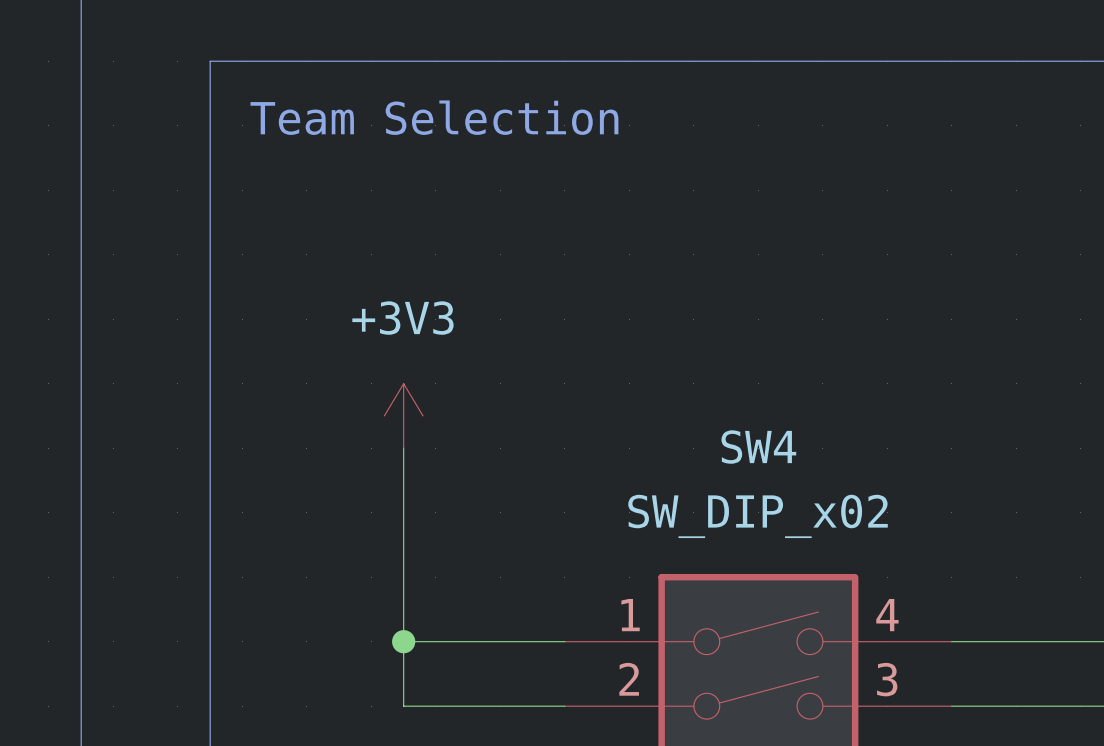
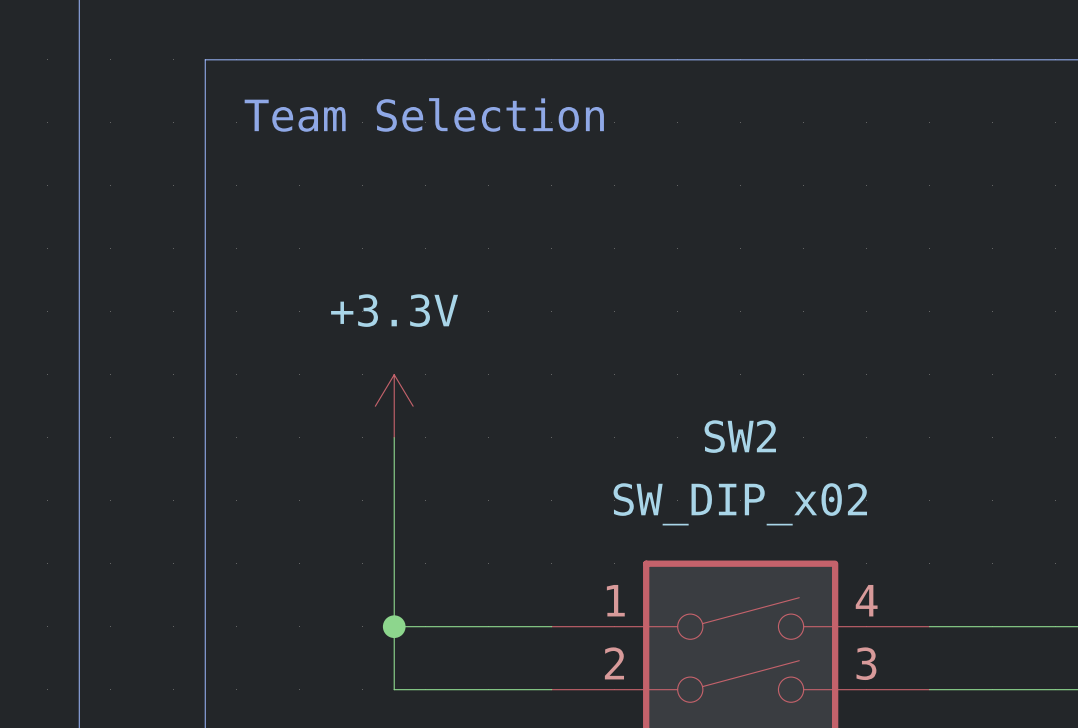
power symbol: +3V3 (403, 415) -> +3.3V (394, 406)
SW4 name: SW4 (758, 447) -> SW2 (740, 436)

